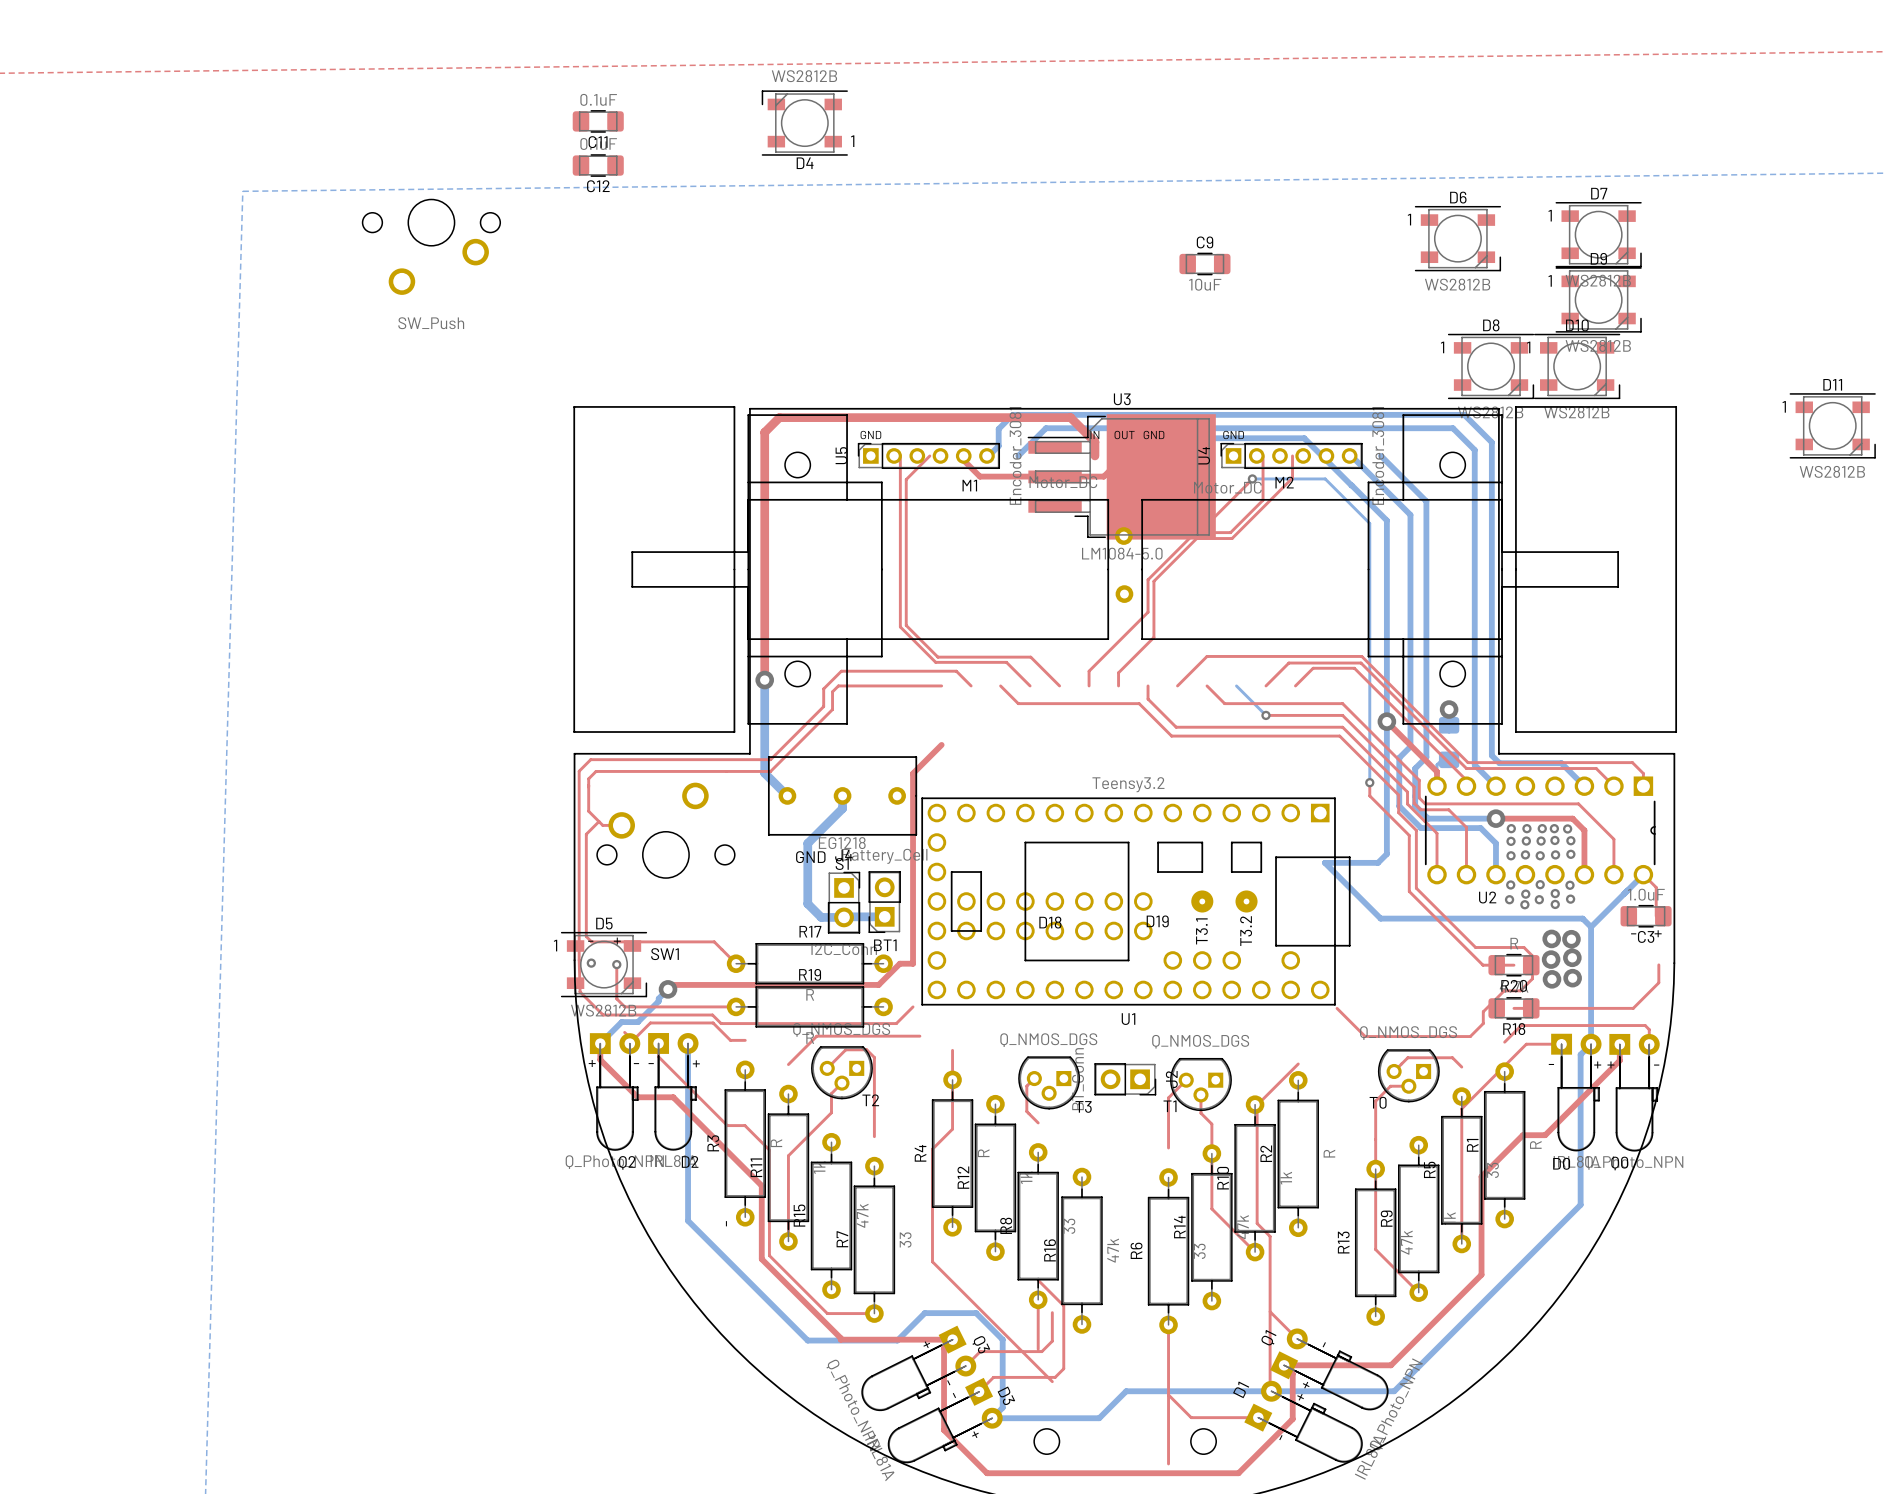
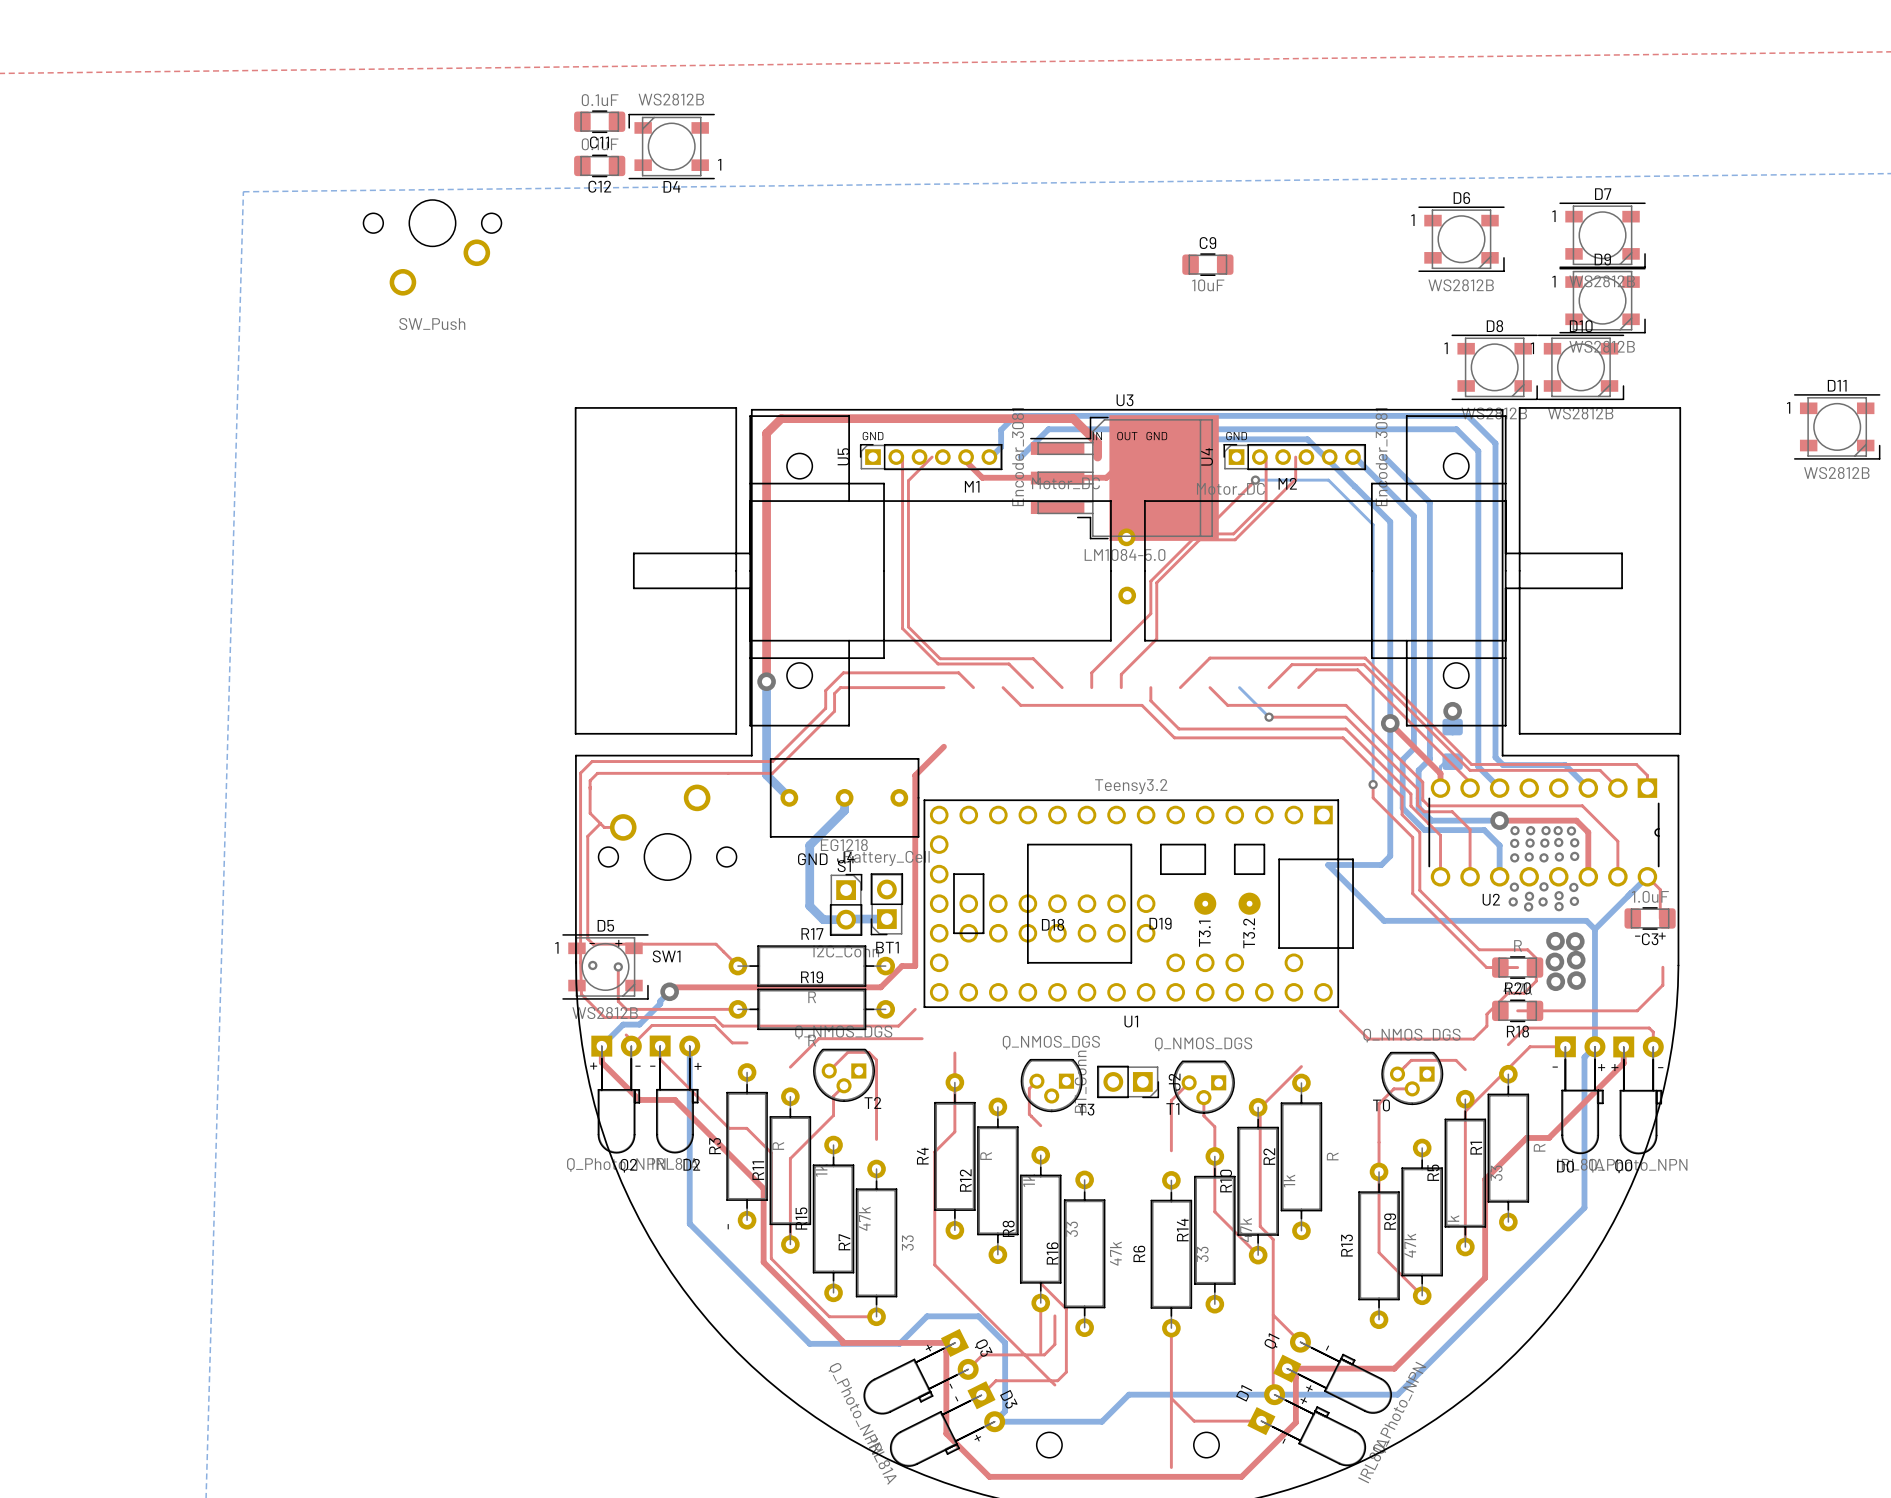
D4 position: (804, 123) -> (671, 146)

